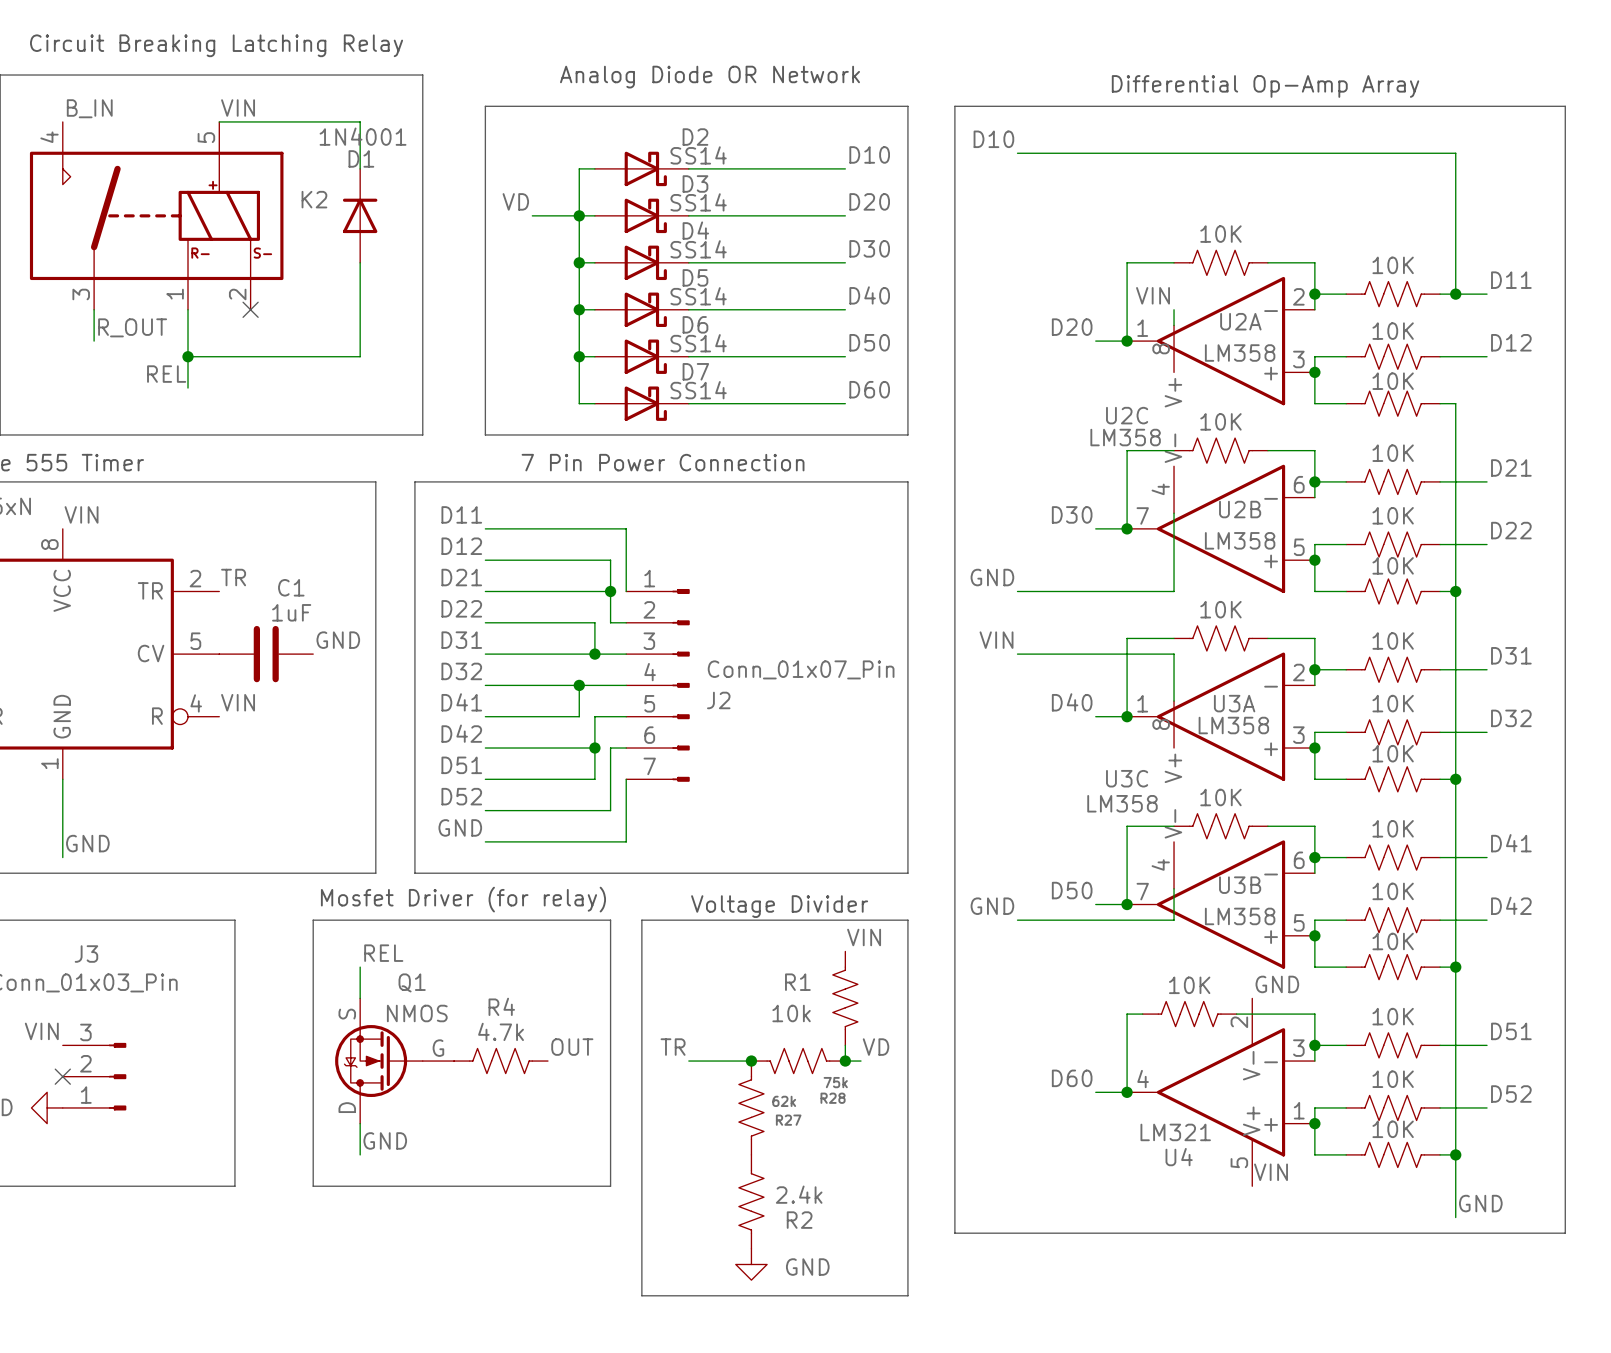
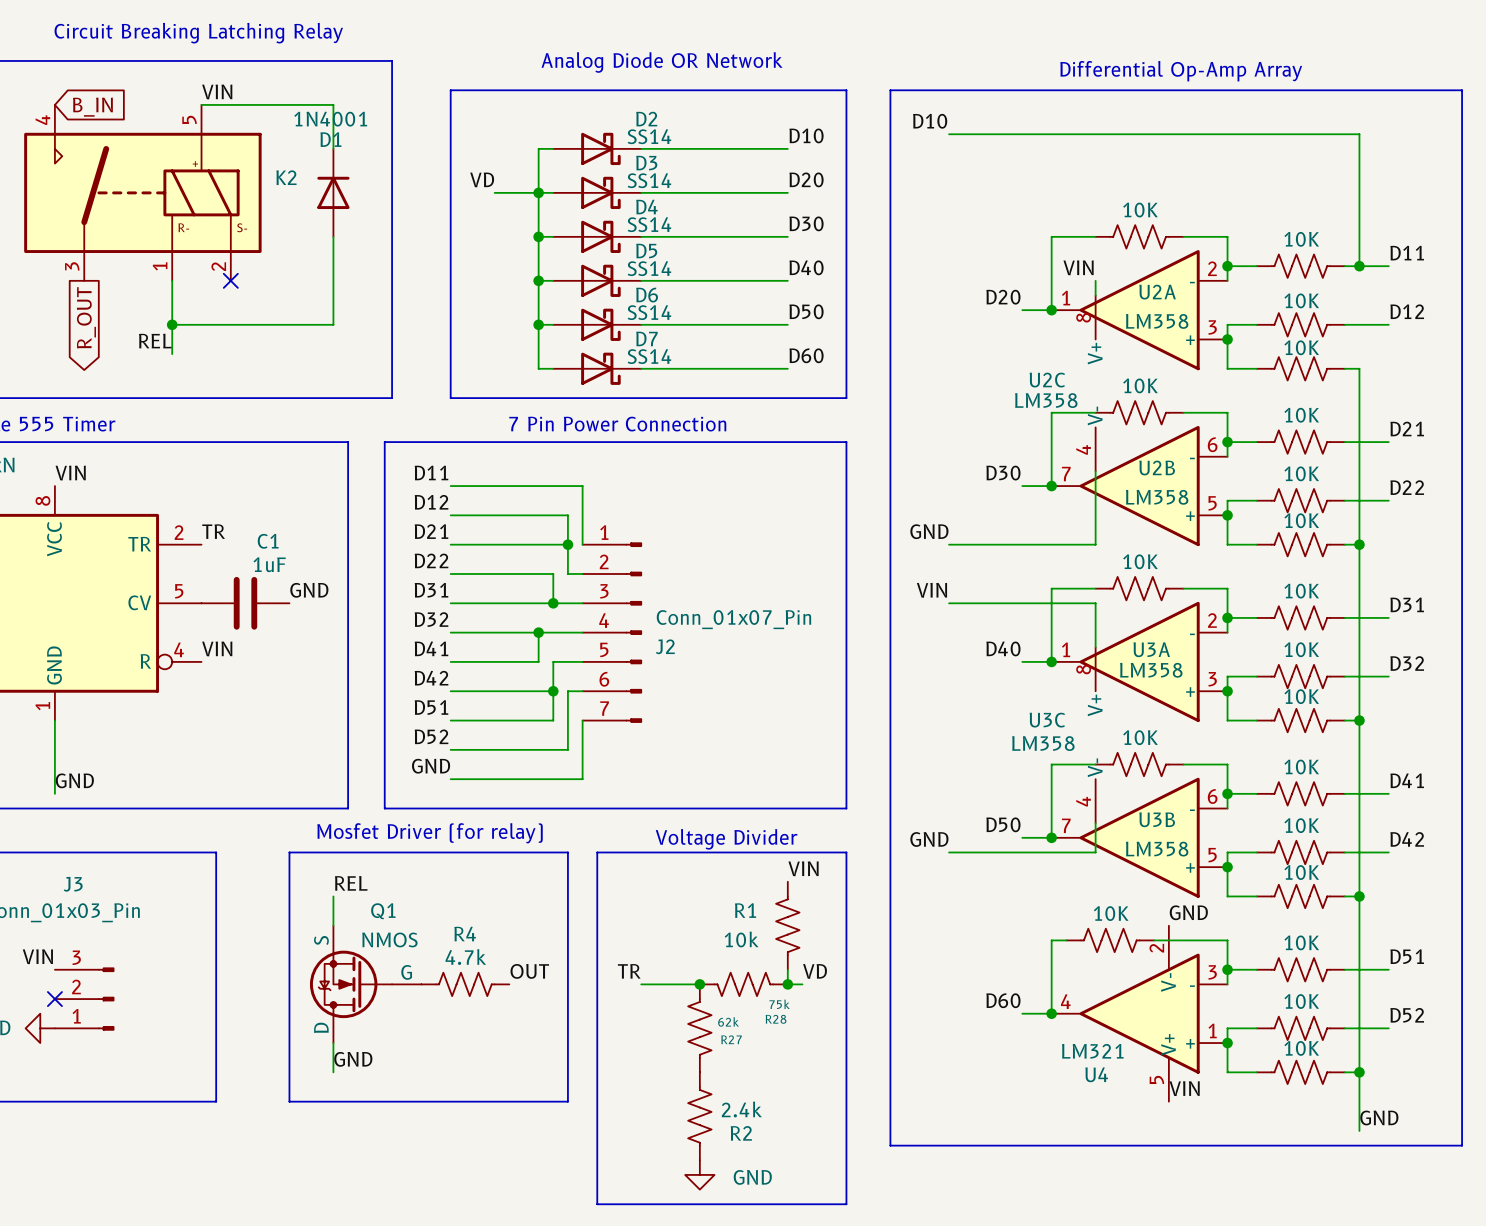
label: B_IN (89, 108) -> none
global label: none -> B_IN (92, 107)
wire: (94, 309) (94, 341) -> none
label: R_OUT (132, 327) -> none
global label: none -> R_OUT (86, 317)

